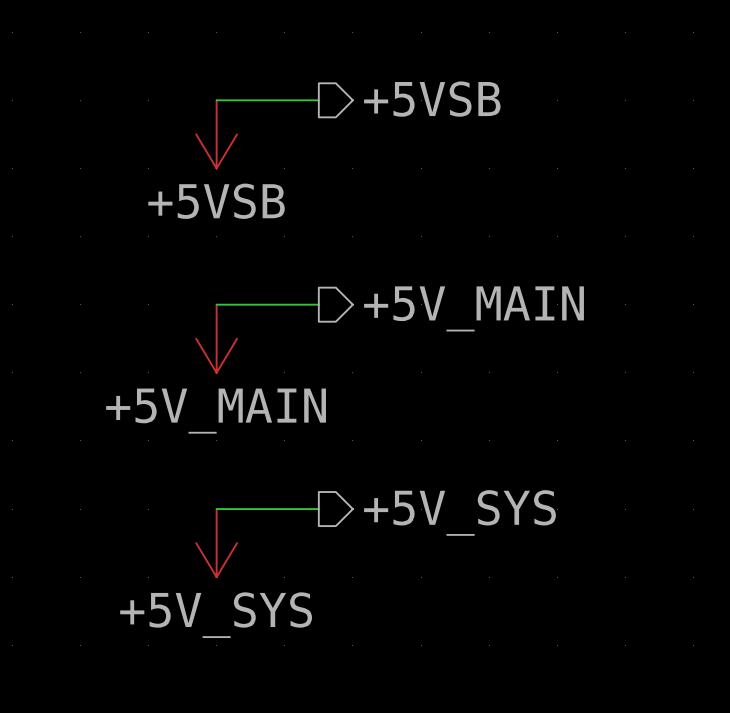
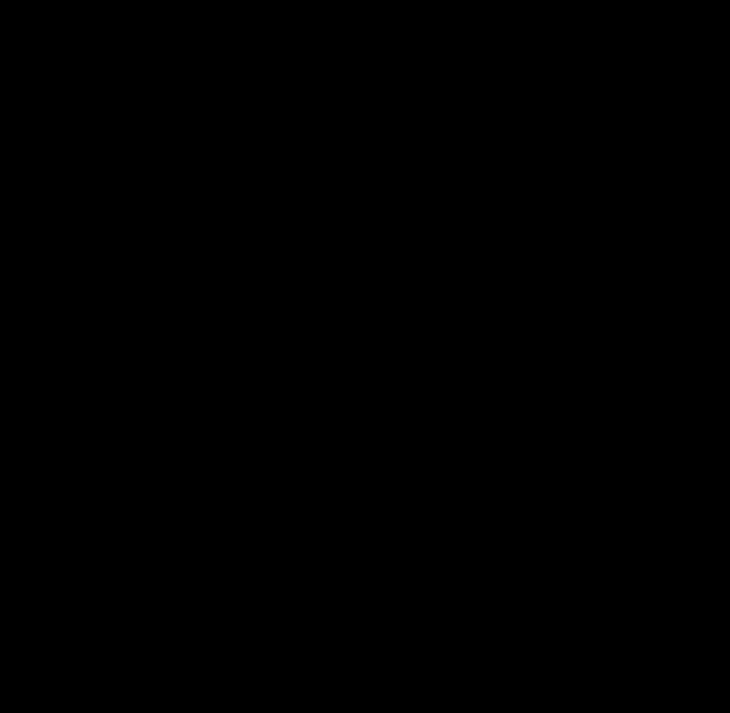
hierarchical label: +5VSB (432, 99) -> none
wire: (216, 100) (318, 100) -> none
power symbol: +5VSB (216, 134) -> none
wire: (216, 304) (318, 304) -> none
hierarchical label: +5V_MAIN (474, 308) -> none
power symbol: +5V_MAIN (216, 338) -> none
wire: (216, 509) (318, 509) -> none
hierarchical label: +5V_SYS (459, 512) -> none
power symbol: +5V_SYS (216, 543) -> none

